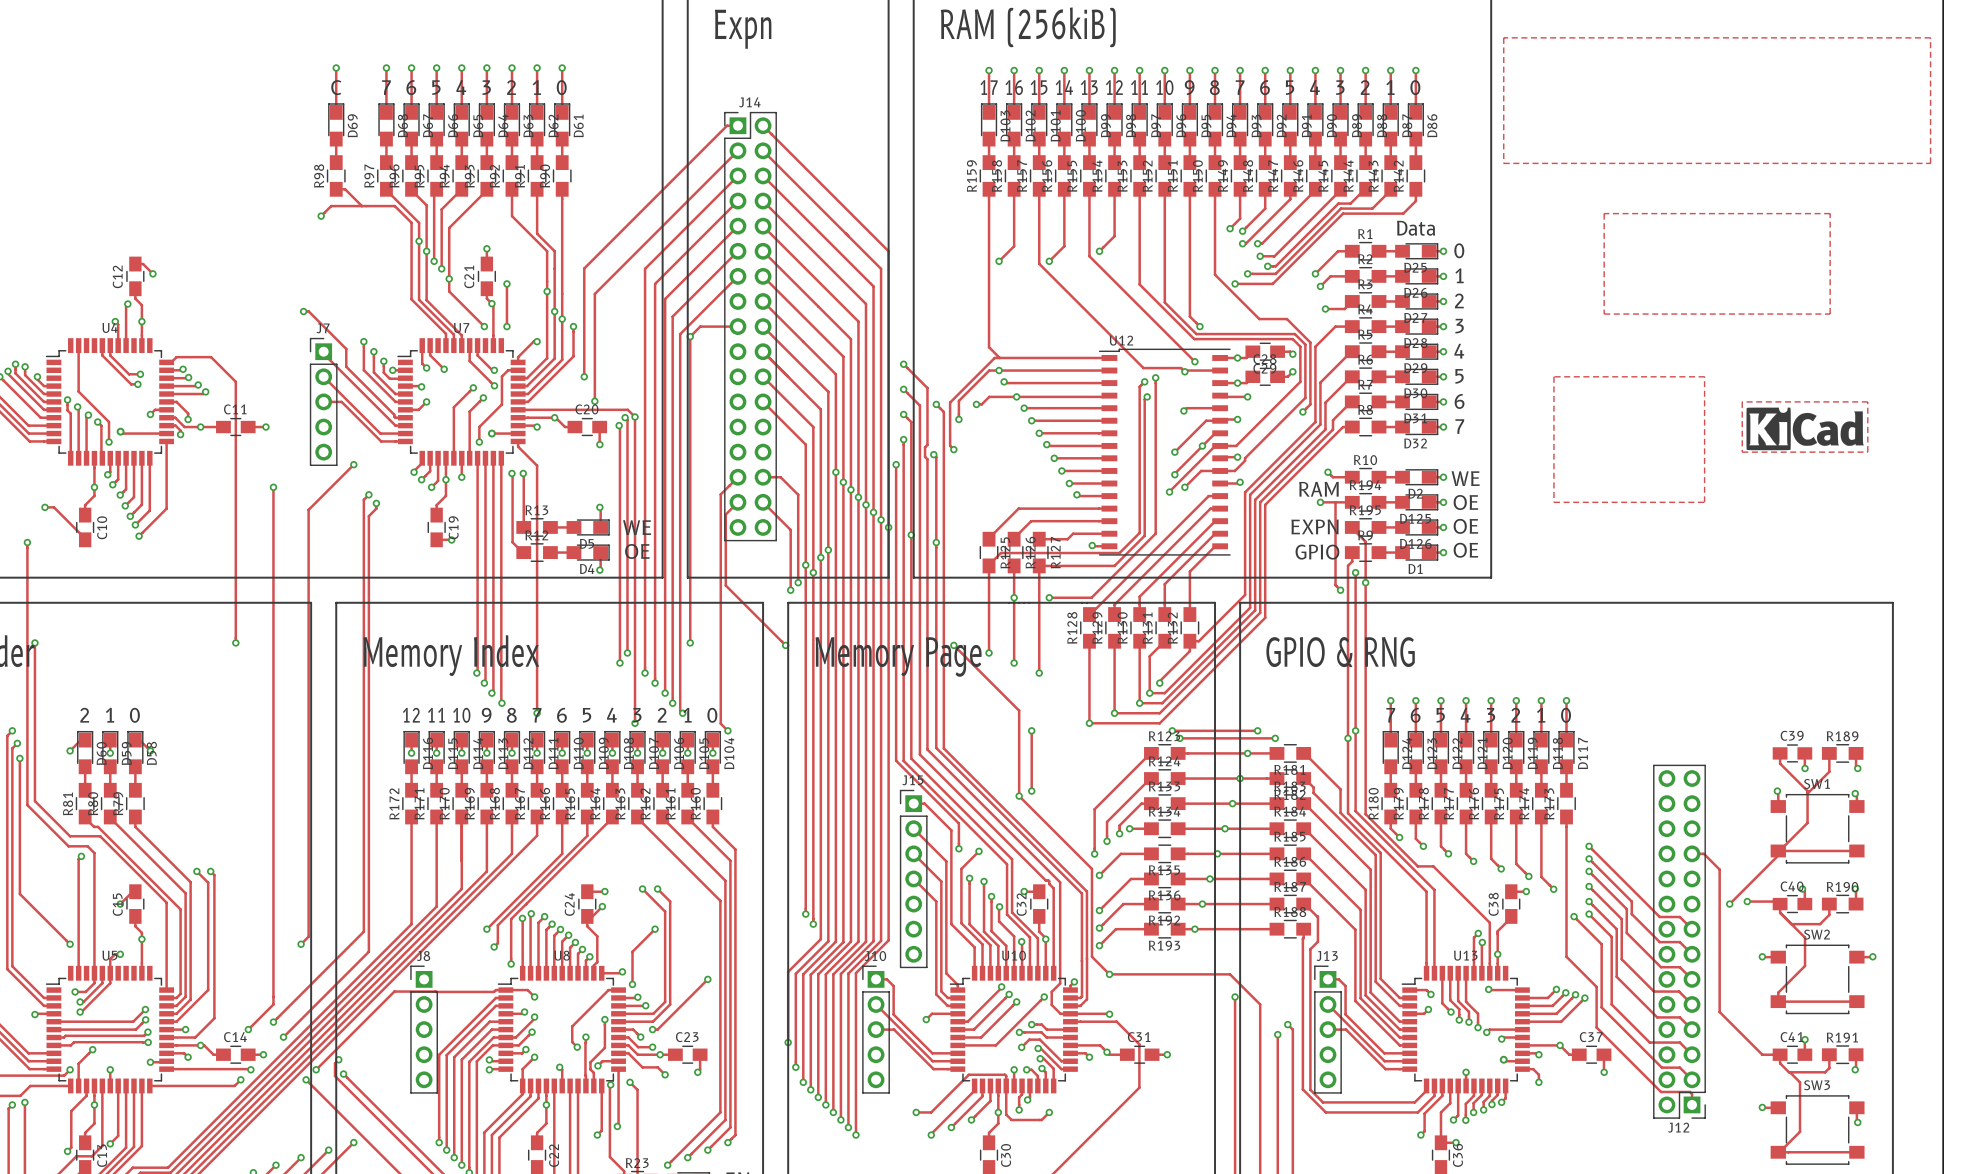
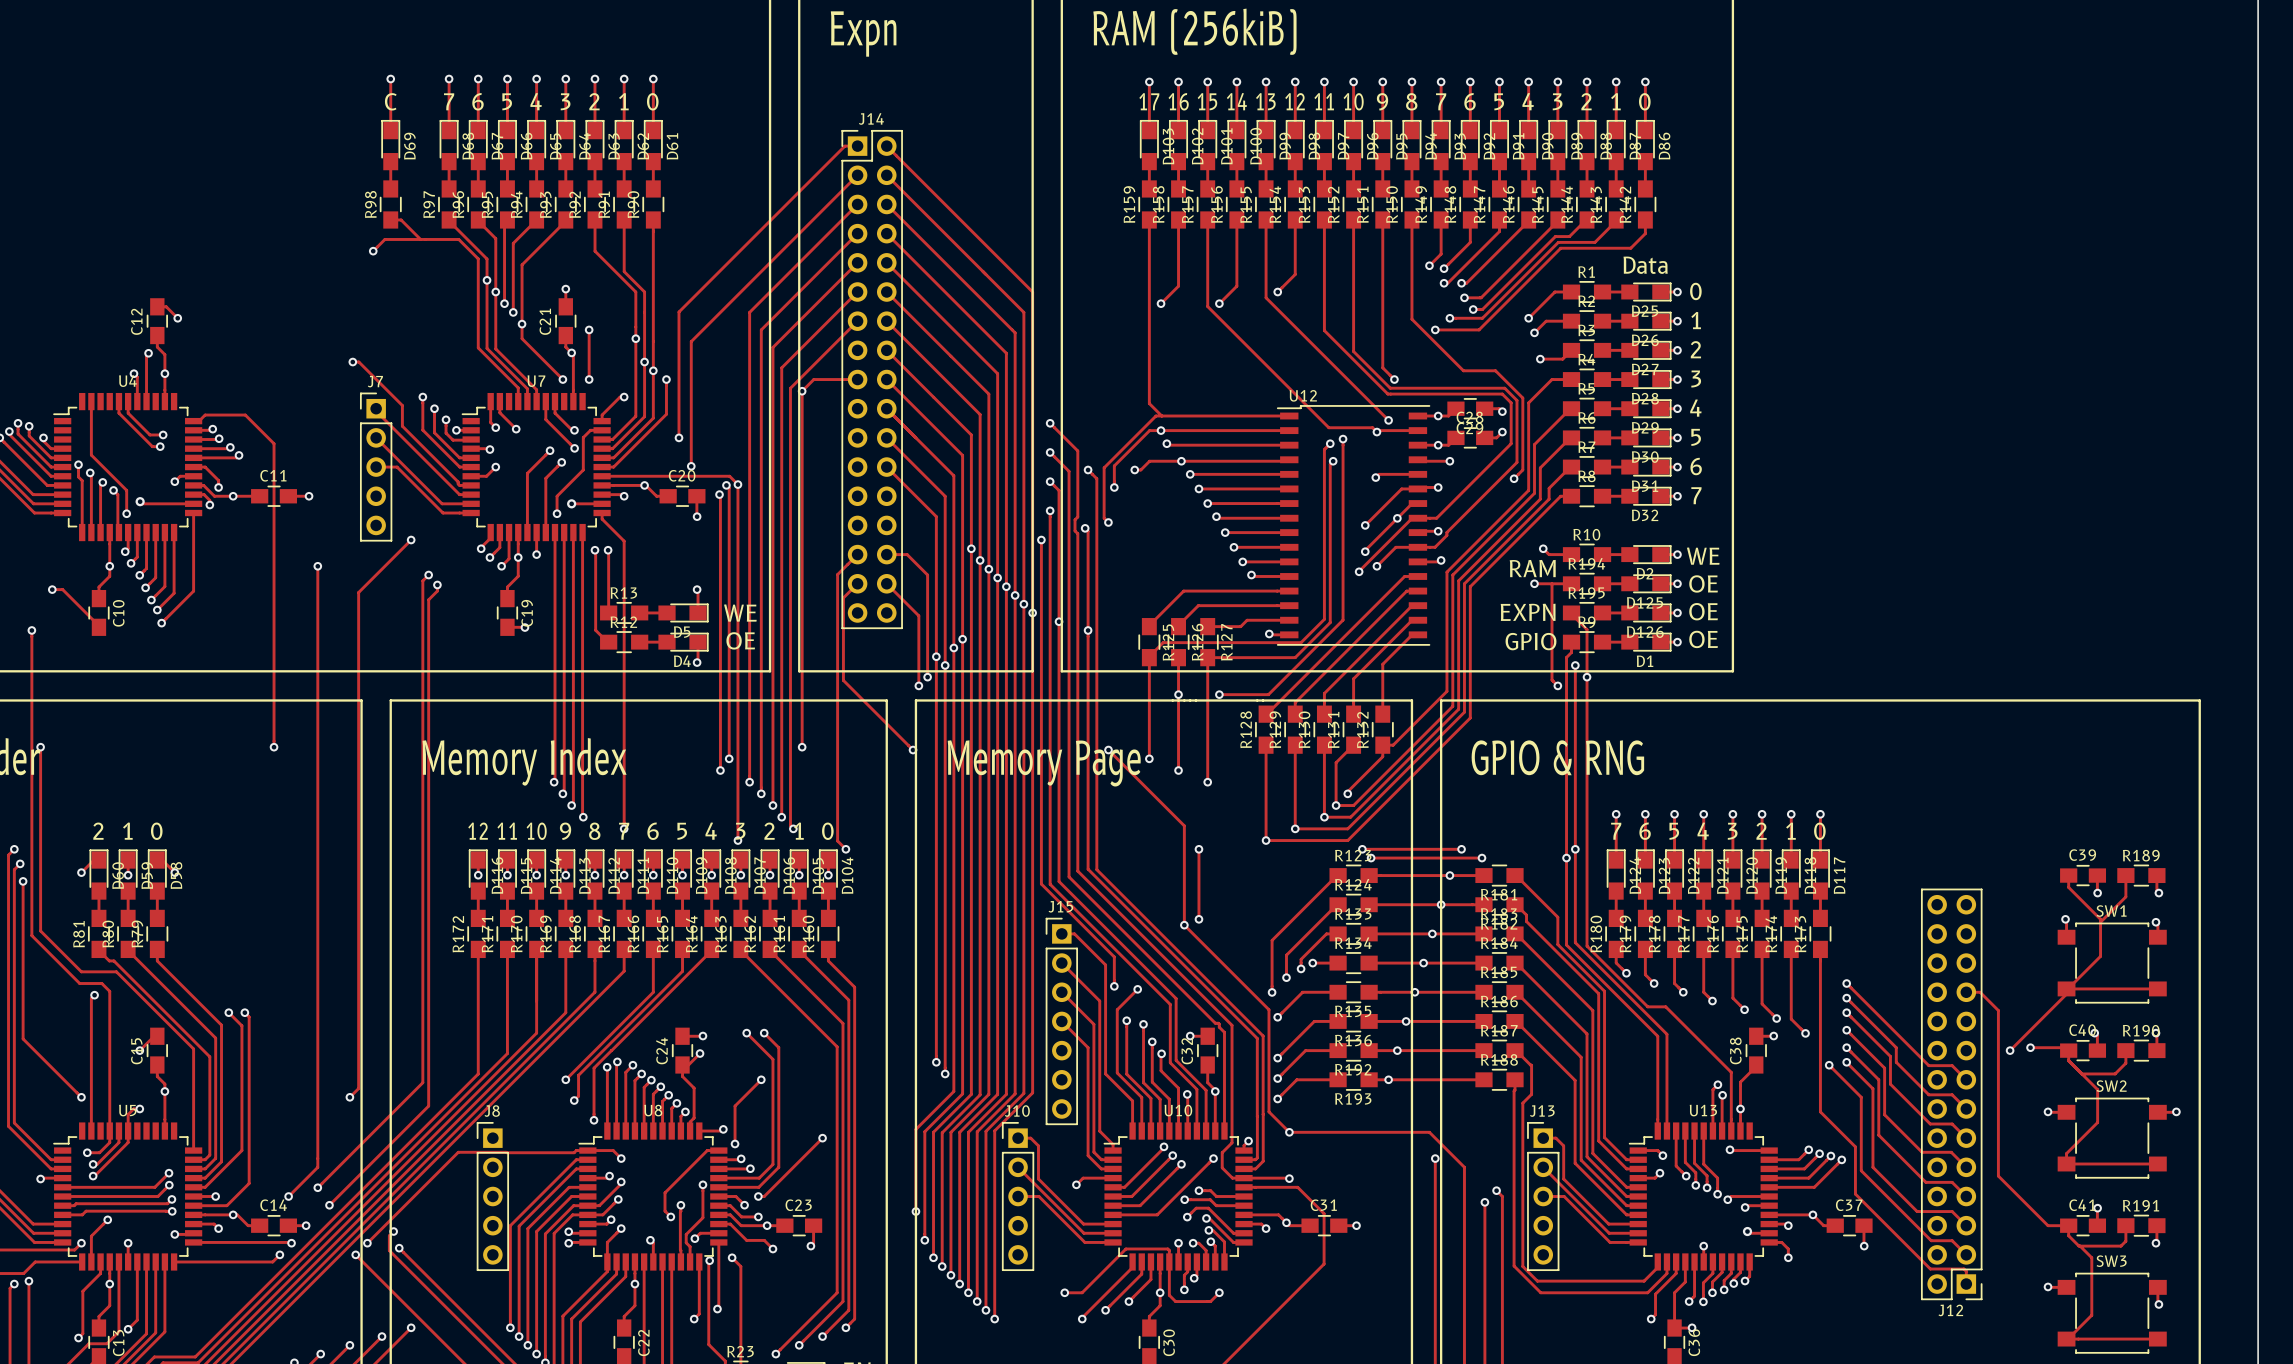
zone outline: (1503, 37) (1503, 163) (1930, 163) (1930, 37) (1503, 37) -> none
zone outline: (1604, 213) (1604, 314) (1830, 314) (1830, 213) (1604, 213) -> none
zone outline: (1553, 376) (1553, 502) (1704, 502) (1704, 376) (1553, 376) -> none
zone outline: (1742, 401) (1742, 452) (1867, 452) (1867, 401) (1742, 401) -> none
drawing: [1746, 407, 1864, 451] -> none

